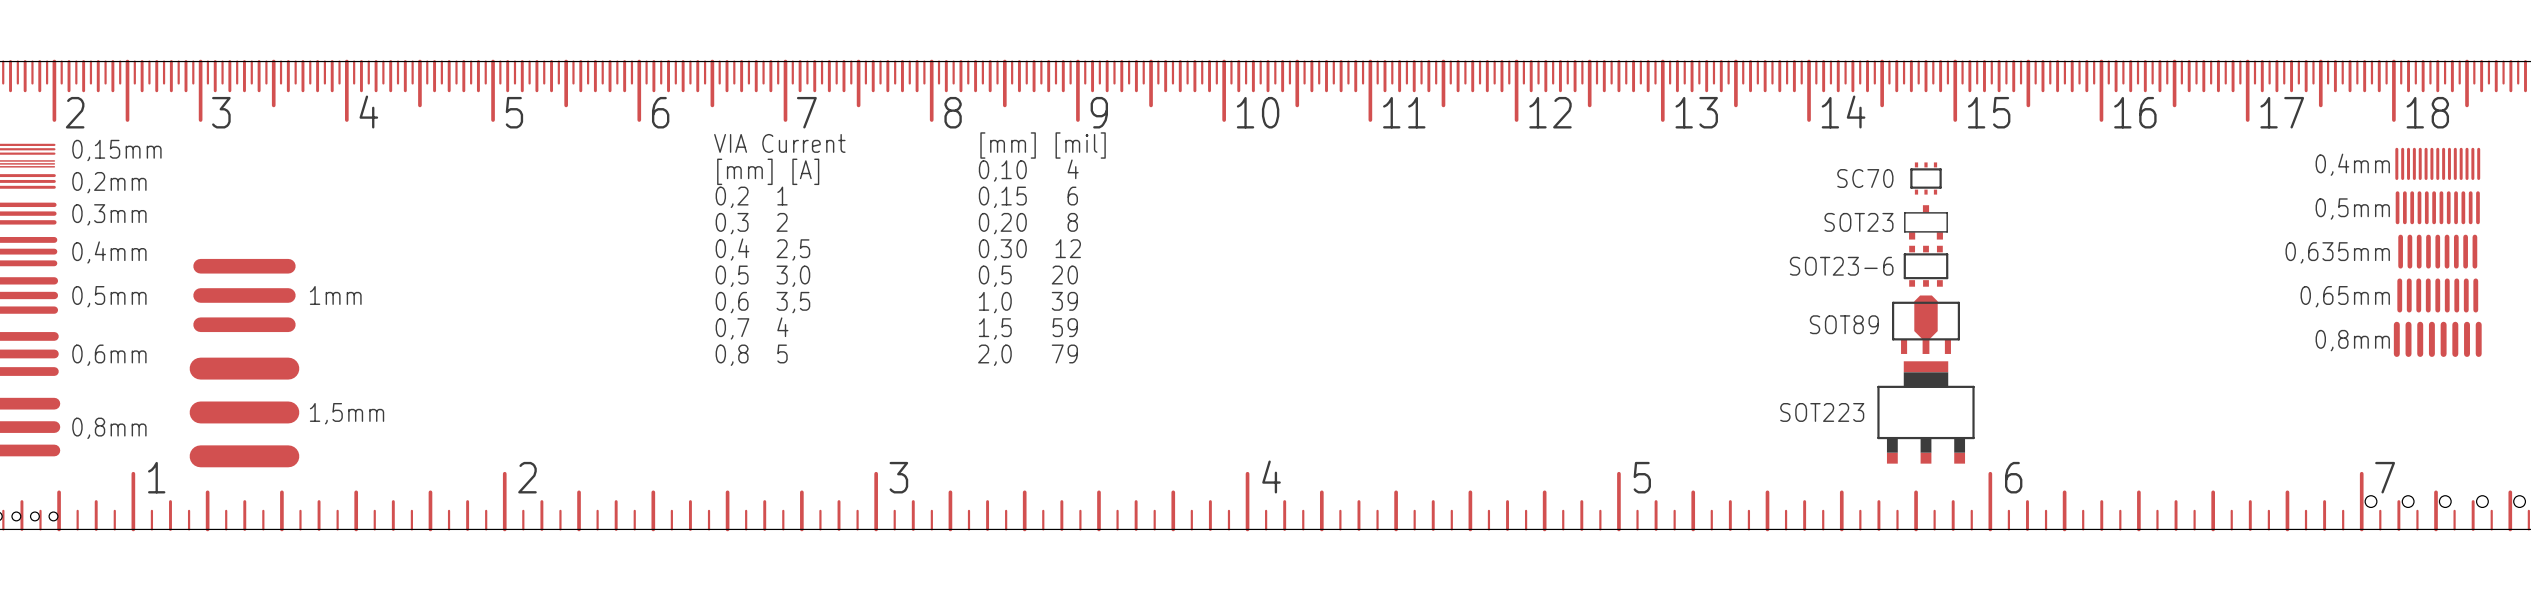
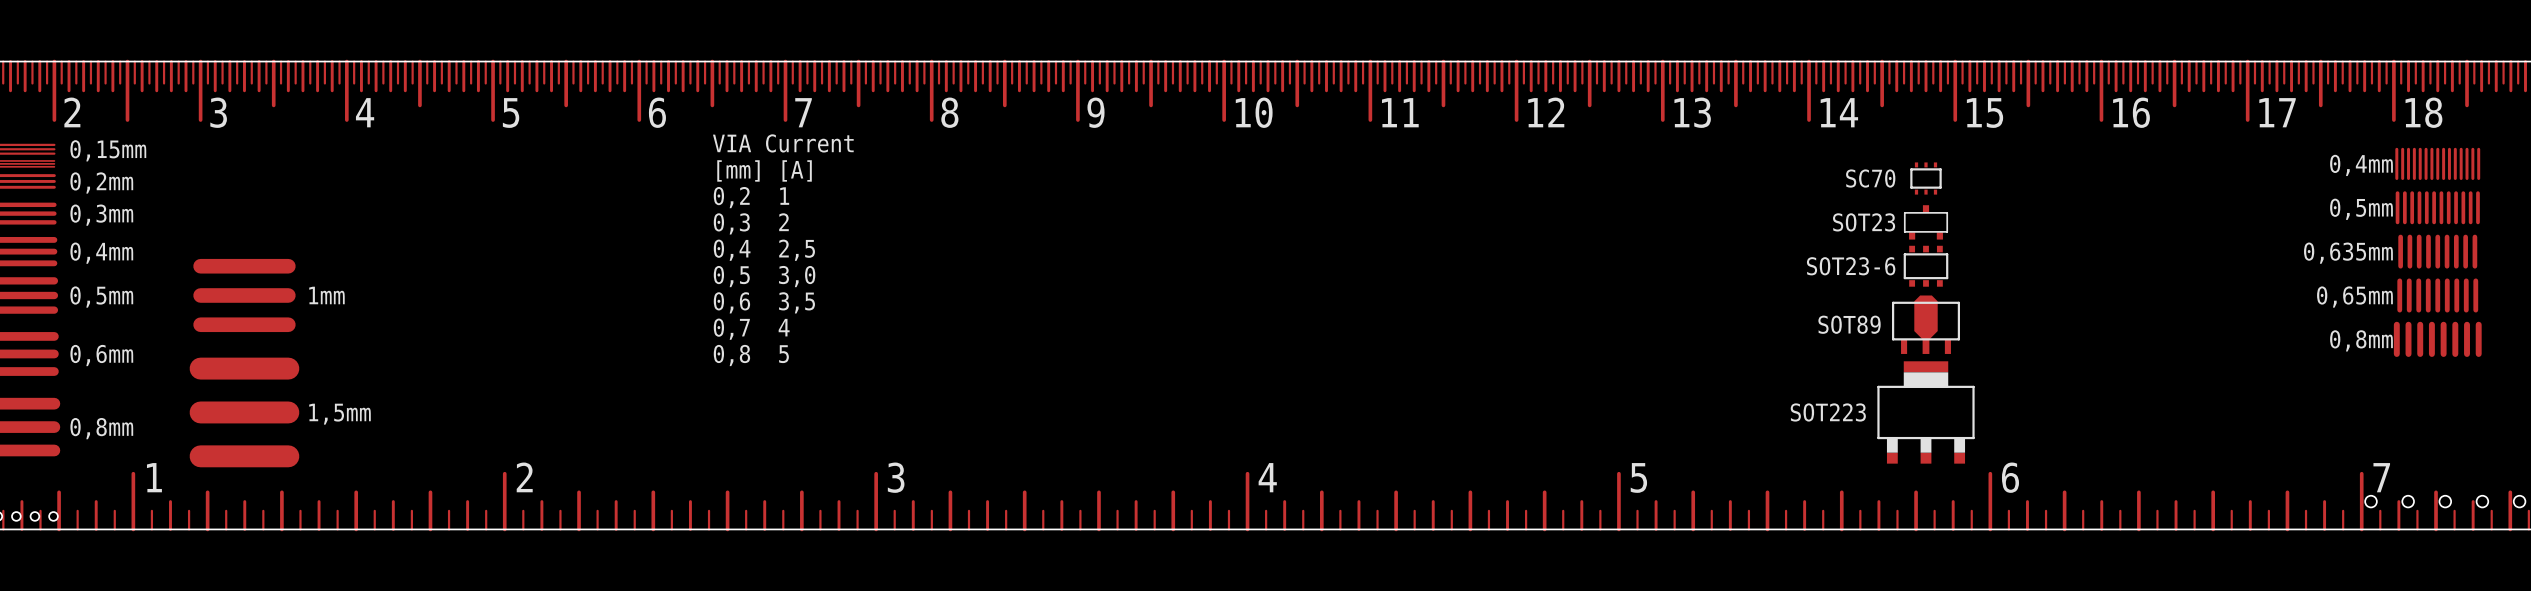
text: [mm] [mil] (1043, 145) -> none
text: 0,10 4 (1028, 170) -> none
text: 0,15 6 (1028, 197) -> none
text: 0,20 8 (1028, 223) -> none
text: 0,30 12 (1029, 249) -> none
text: 0,5 20 (1028, 276) -> none
text: 1,0 39 (1028, 302) -> none
text: 1,5 59 (1028, 328) -> none
text: 2,0 79 (1028, 355) -> none

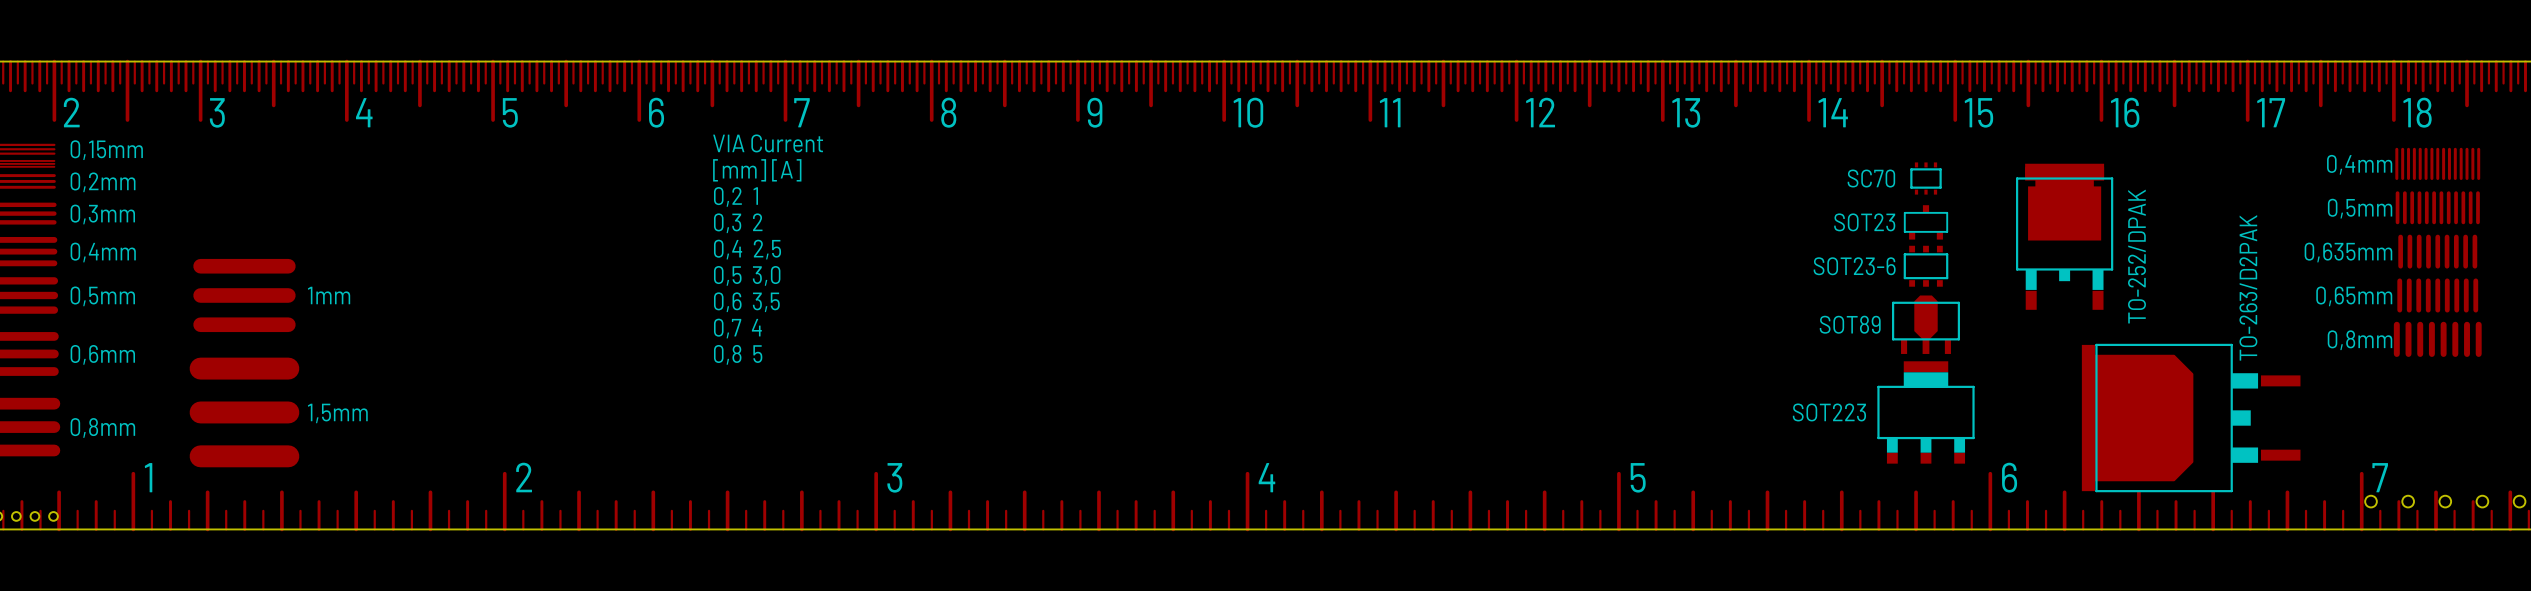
part: none -> (2064, 236)
text: none -> TO-252/DPAK (2136, 256)
text: none -> TO-263/D2PAK (2248, 287)
part: none -> (2191, 418)

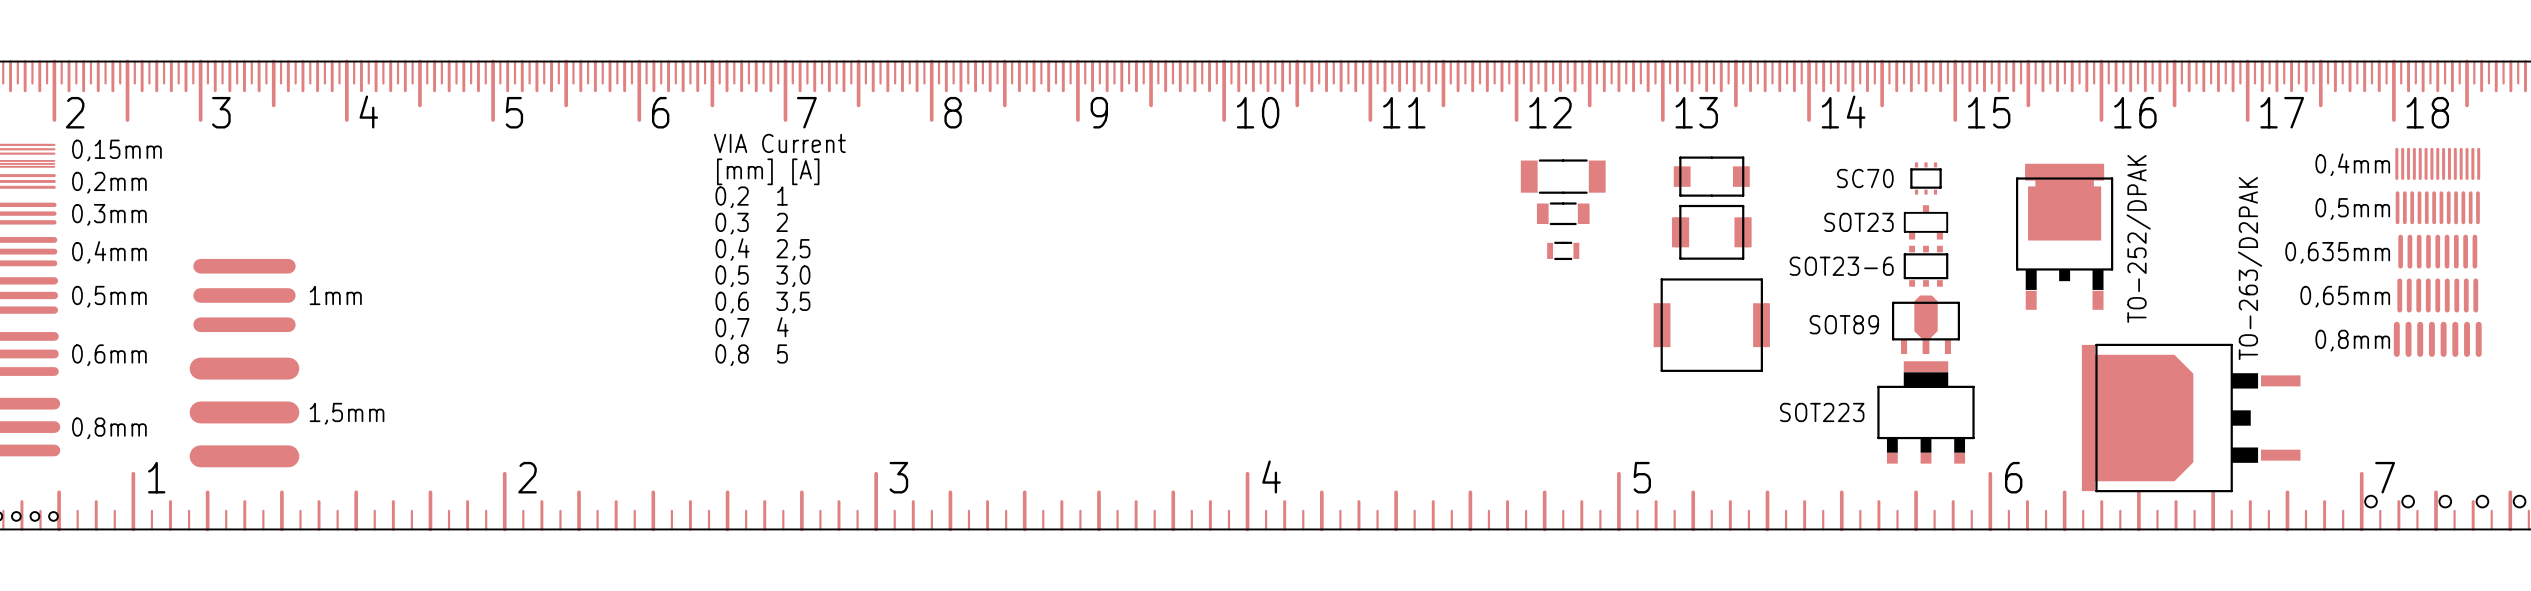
part: none -> (1563, 176)
part: none -> (1711, 176)
part: none -> (1563, 213)
part: none -> (1711, 232)
part: none -> (1563, 250)
part: none -> (1711, 325)

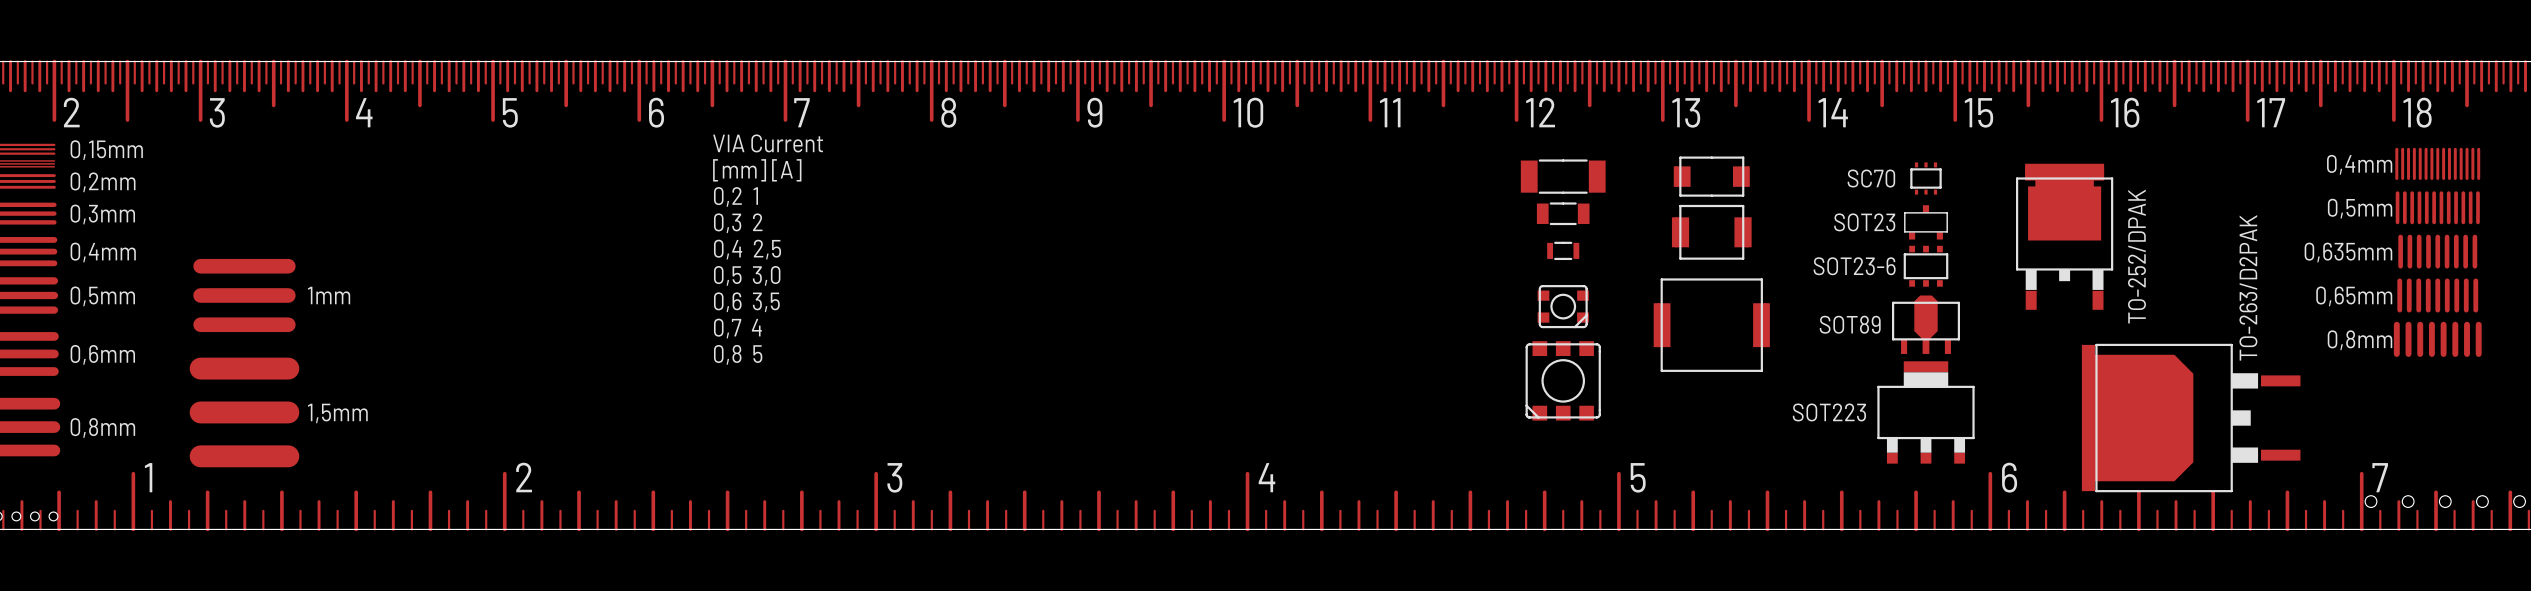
part: none -> (1563, 306)
part: none -> (1563, 380)

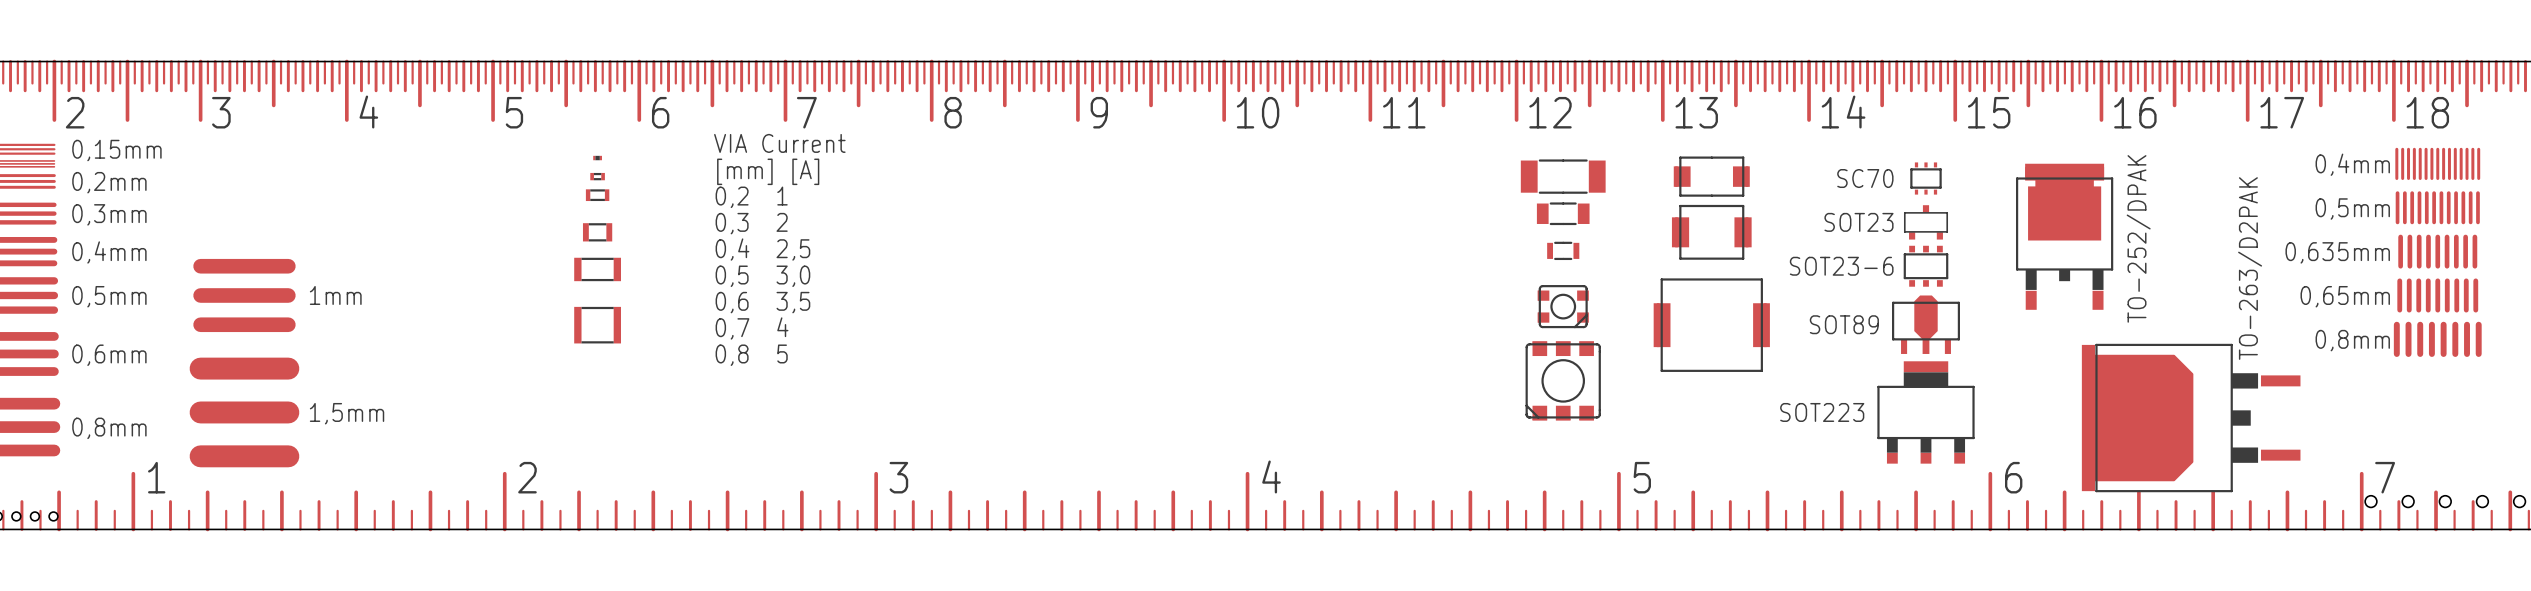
part: none -> (597, 158)
part: none -> (597, 176)
part: none -> (597, 195)
part: none -> (597, 232)
part: none -> (597, 269)
part: none -> (597, 325)

